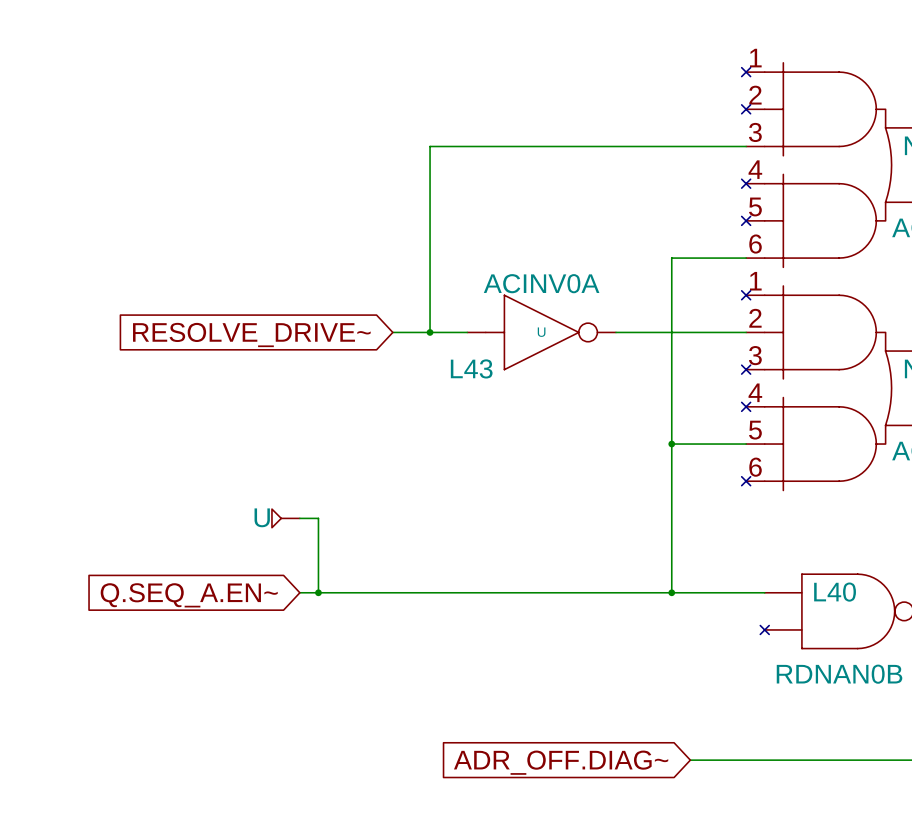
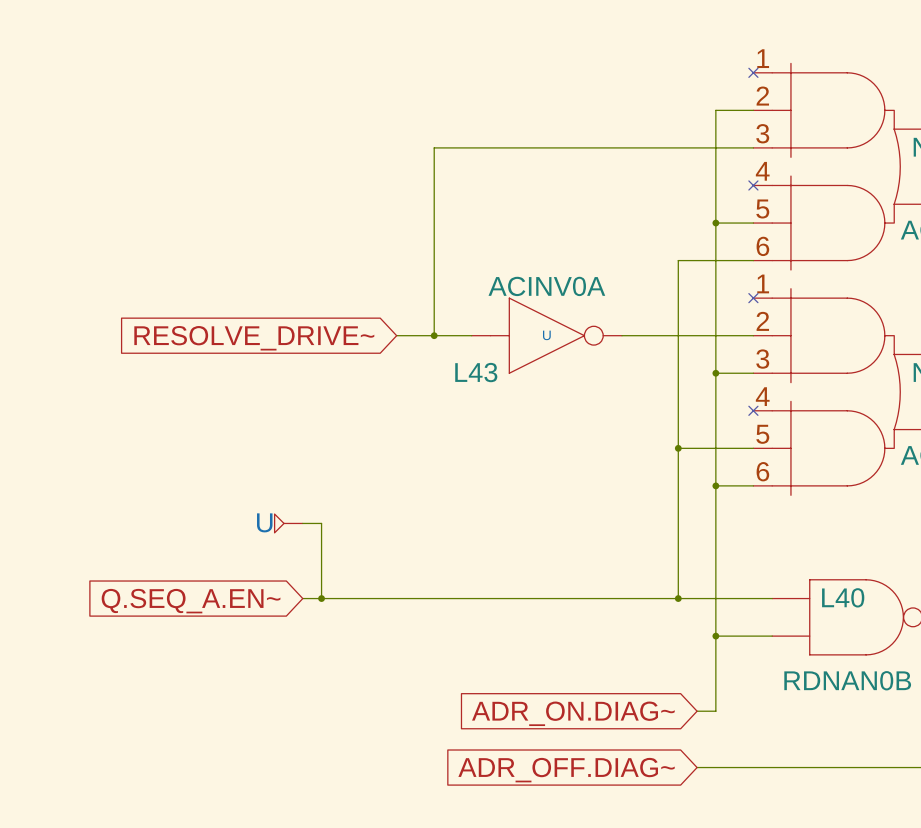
wire: none -> (753, 110) (715, 110) (715, 711) (697, 711)
no-connect mark: (746, 109) -> none
wire: none -> (715, 223) (753, 223)
junction: none -> (715, 223)
no-connect mark: (746, 220) -> none
wire: none -> (715, 373) (753, 373)
junction: none -> (715, 373)
no-connect mark: (746, 369) -> none
wire: none -> (715, 485) (753, 485)
junction: none -> (715, 485)
no-connect mark: (746, 481) -> none
wire: none -> (715, 636) (772, 636)
junction: none -> (715, 636)
no-connect mark: (764, 629) -> none
global label: none -> ADR_ON.DIAG~ (573, 713)

